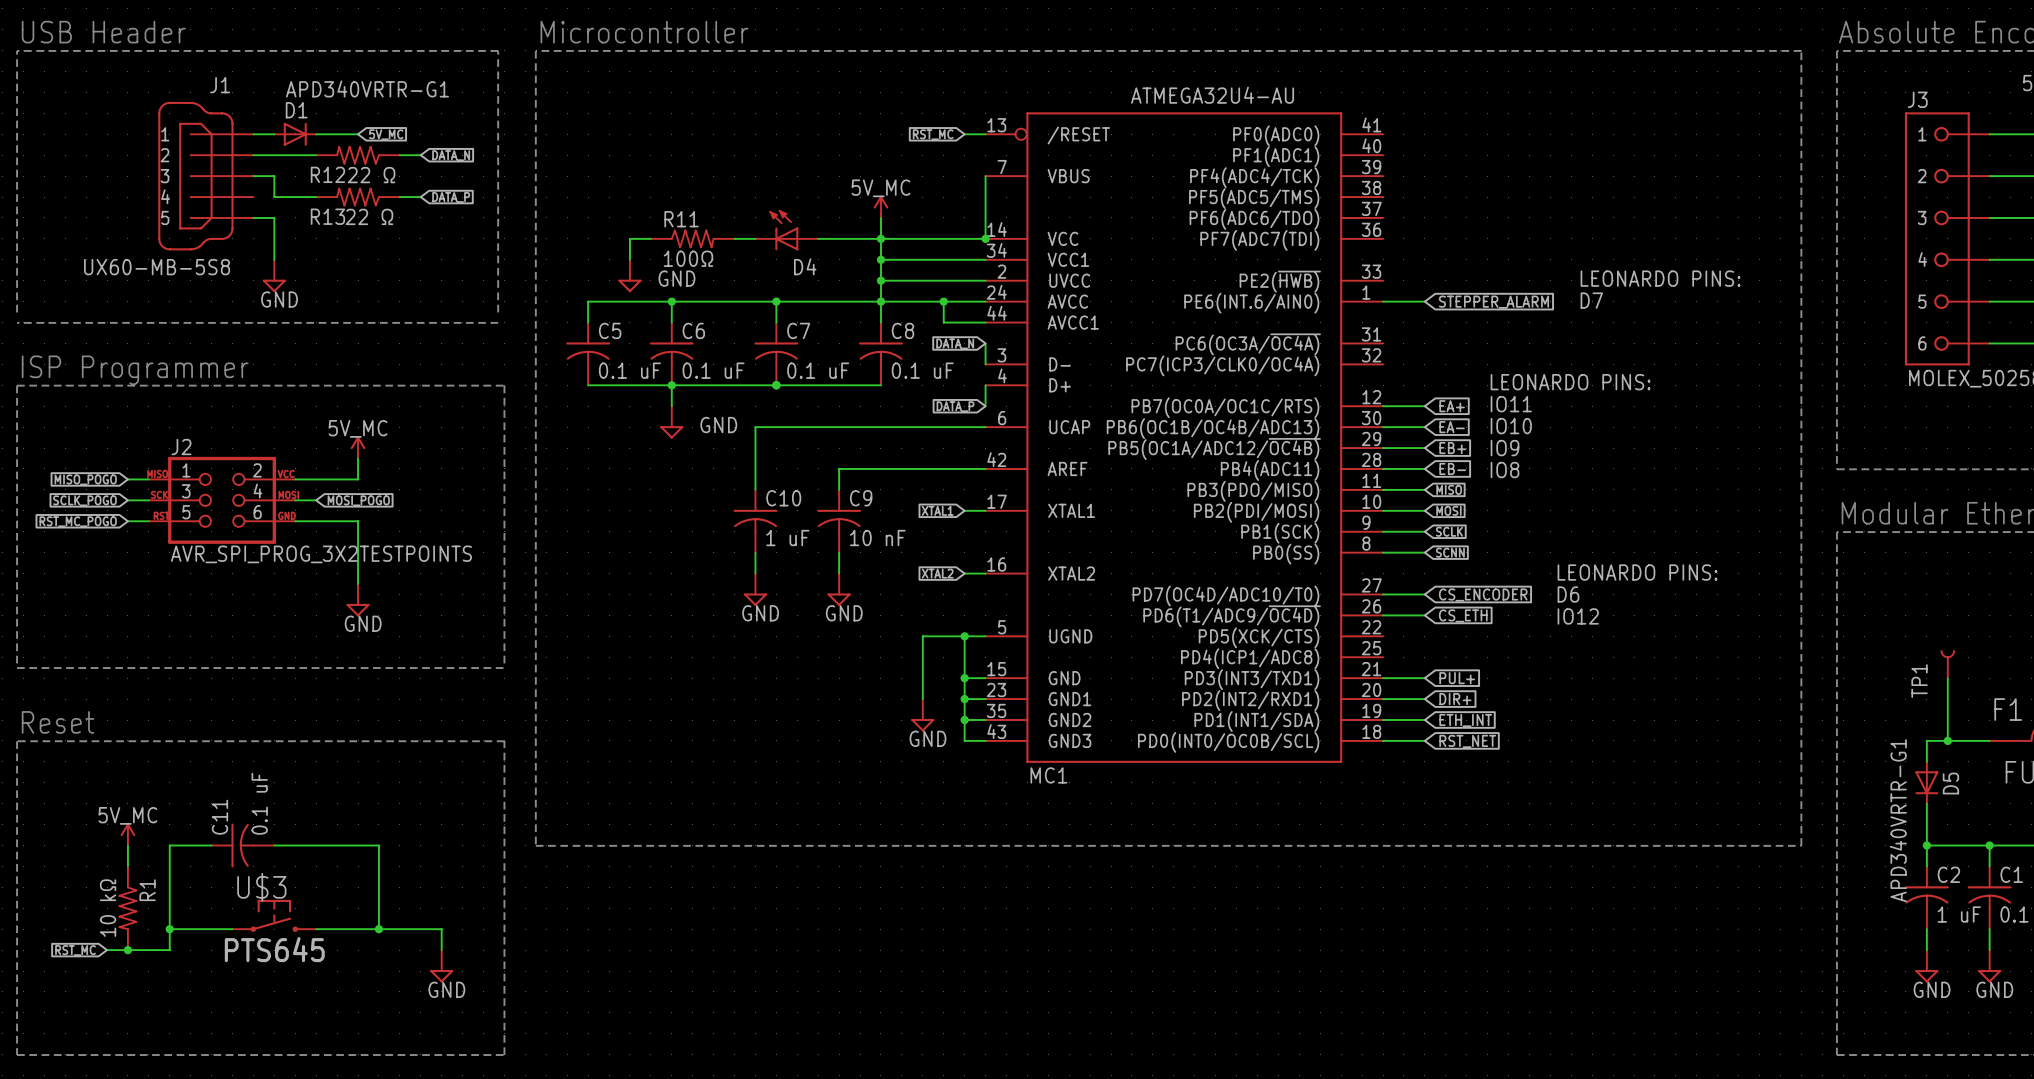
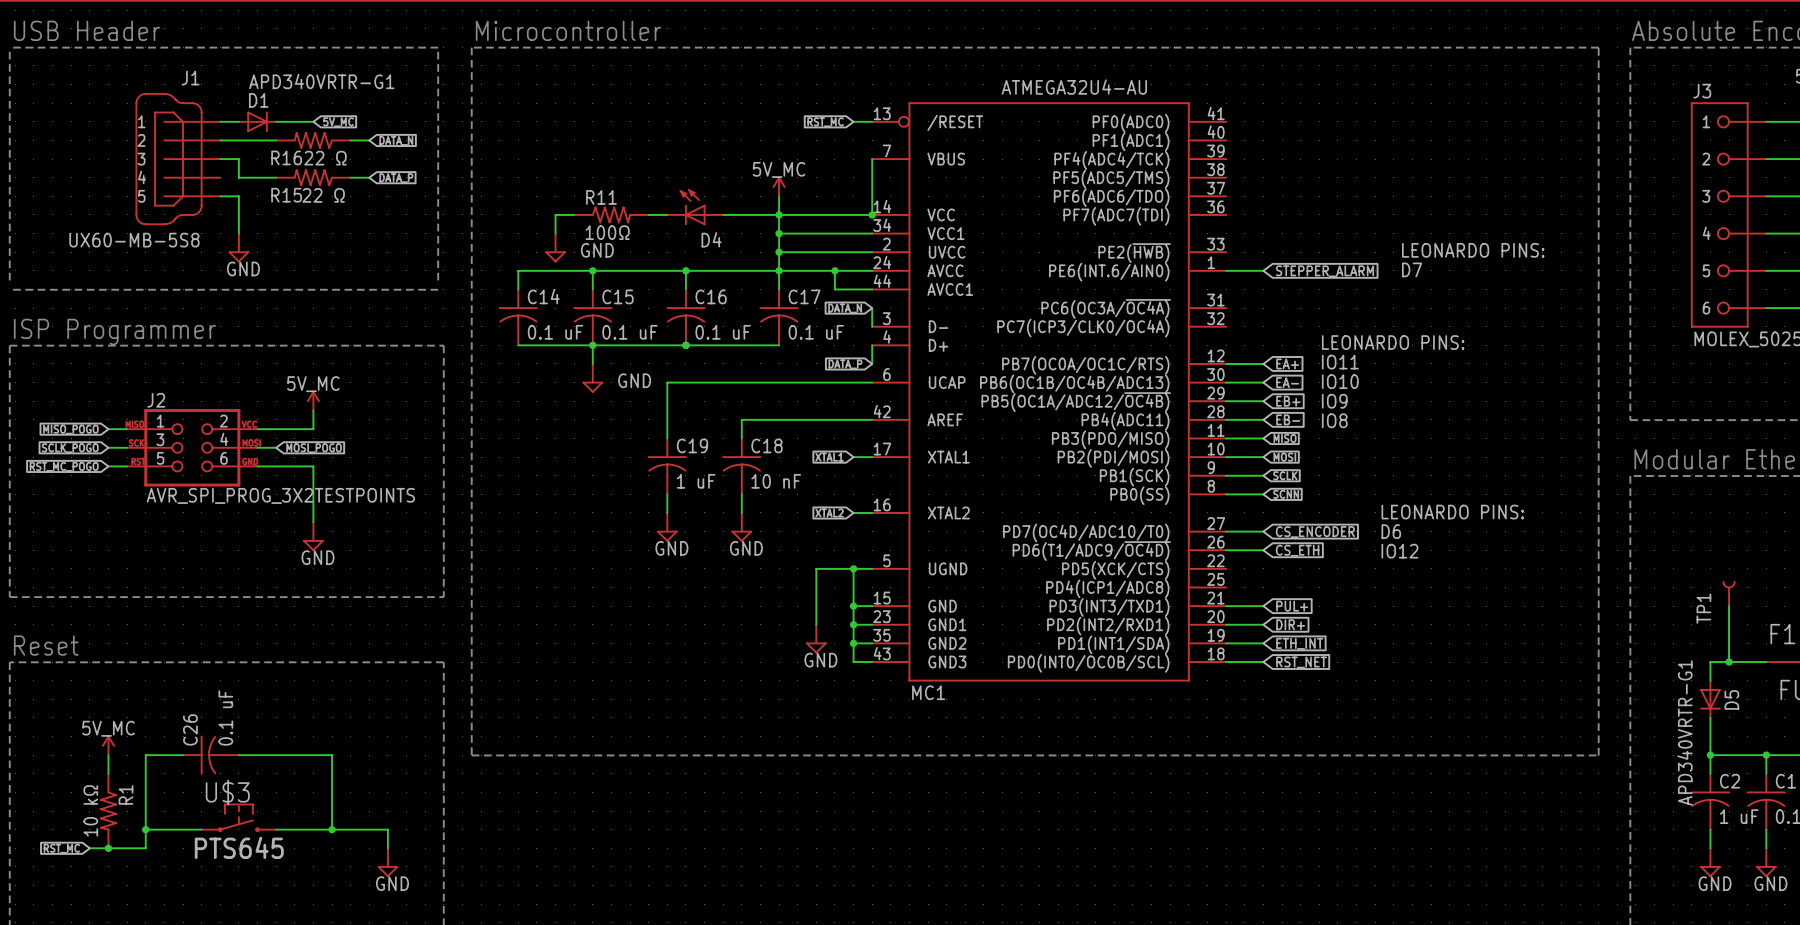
R12 name: R12 (327, 174) -> R16 (286, 157)
R13 name: R13 (327, 216) -> R15 (286, 195)
C5 name: C5 (610, 330) -> C14 (543, 296)
C6 name: C6 (693, 330) -> C15 (617, 296)
C7 name: C7 (798, 330) -> C16 (711, 296)
C8 name: C8 (902, 330) -> C17 (804, 296)
C10 name: C10 (783, 498) -> C19 (692, 445)
C9 name: C9 (861, 498) -> C18 (767, 445)
C11 name: C11 (219, 817) -> C26 (190, 729)

